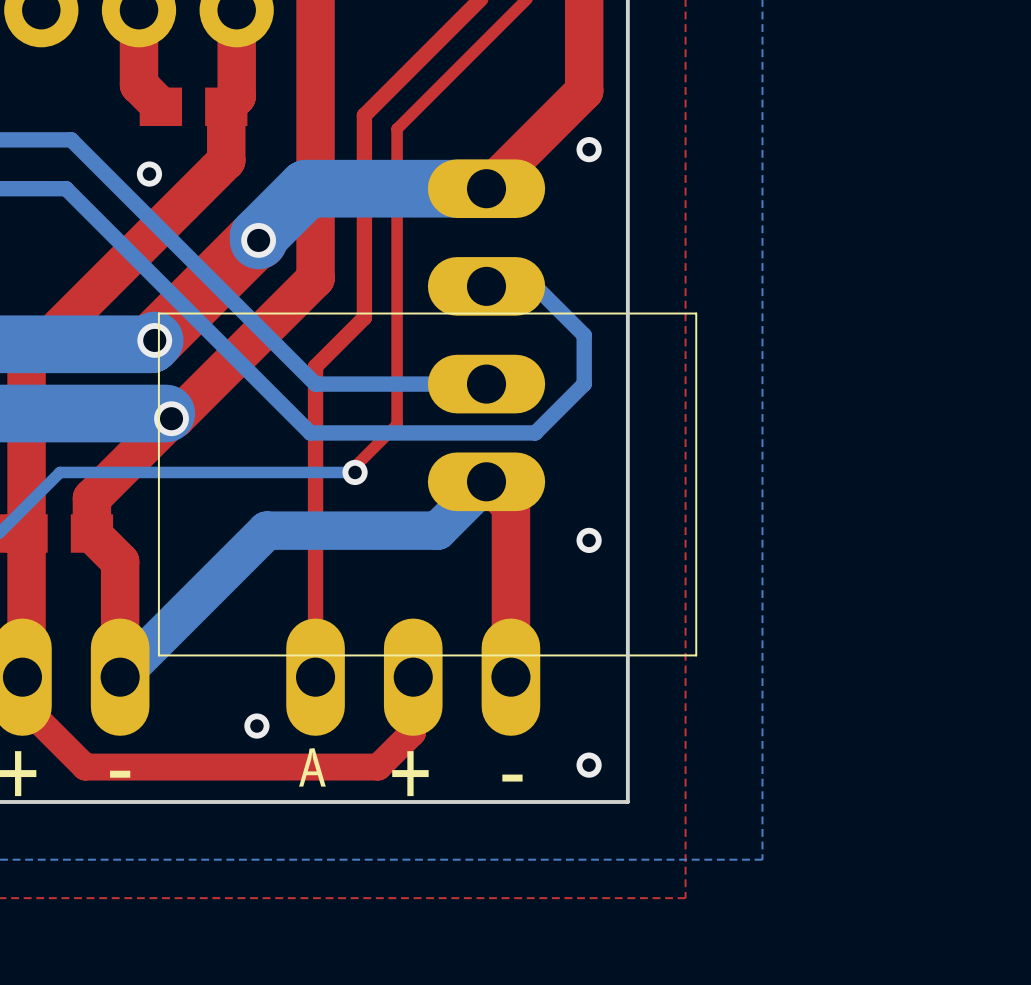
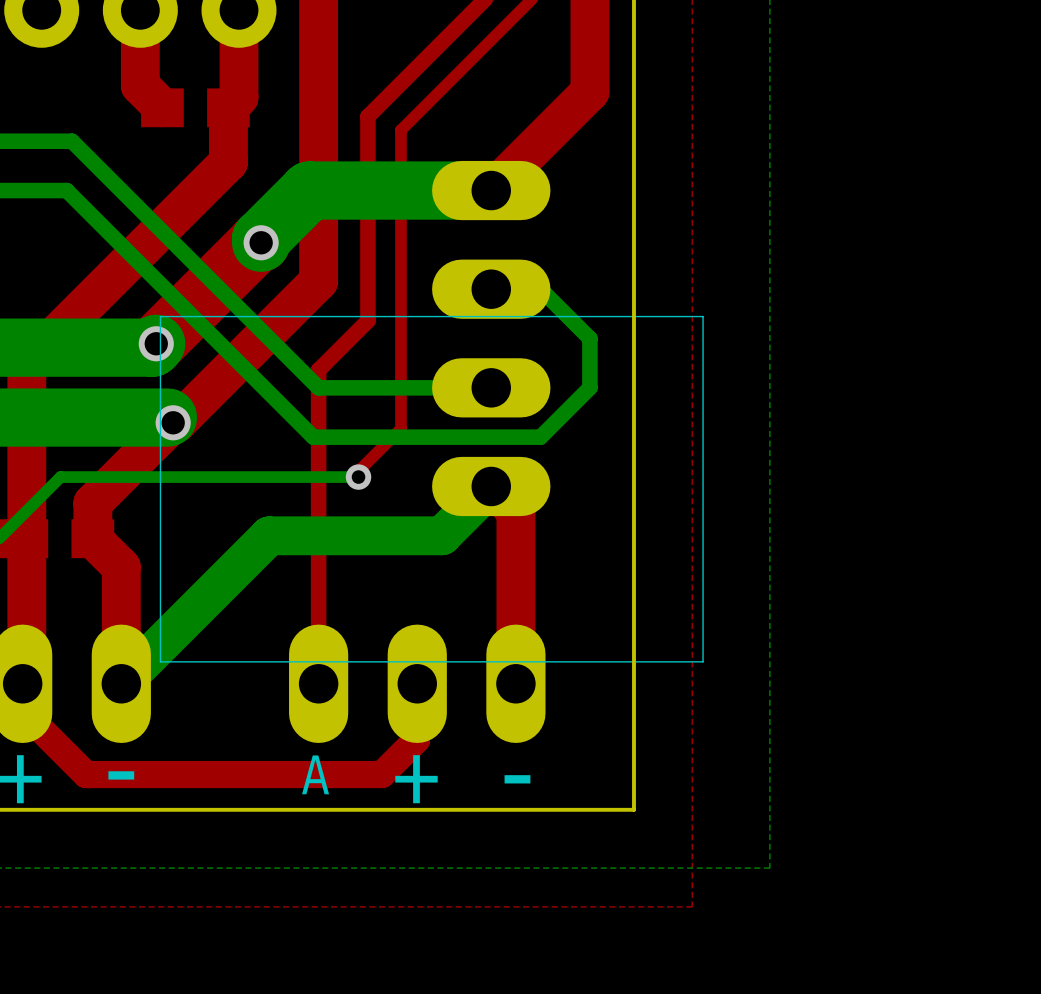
via: (589, 149) -> none
via: (149, 174) -> none
via: (589, 540) -> none
via: (256, 726) -> none
via: (589, 765) -> none

